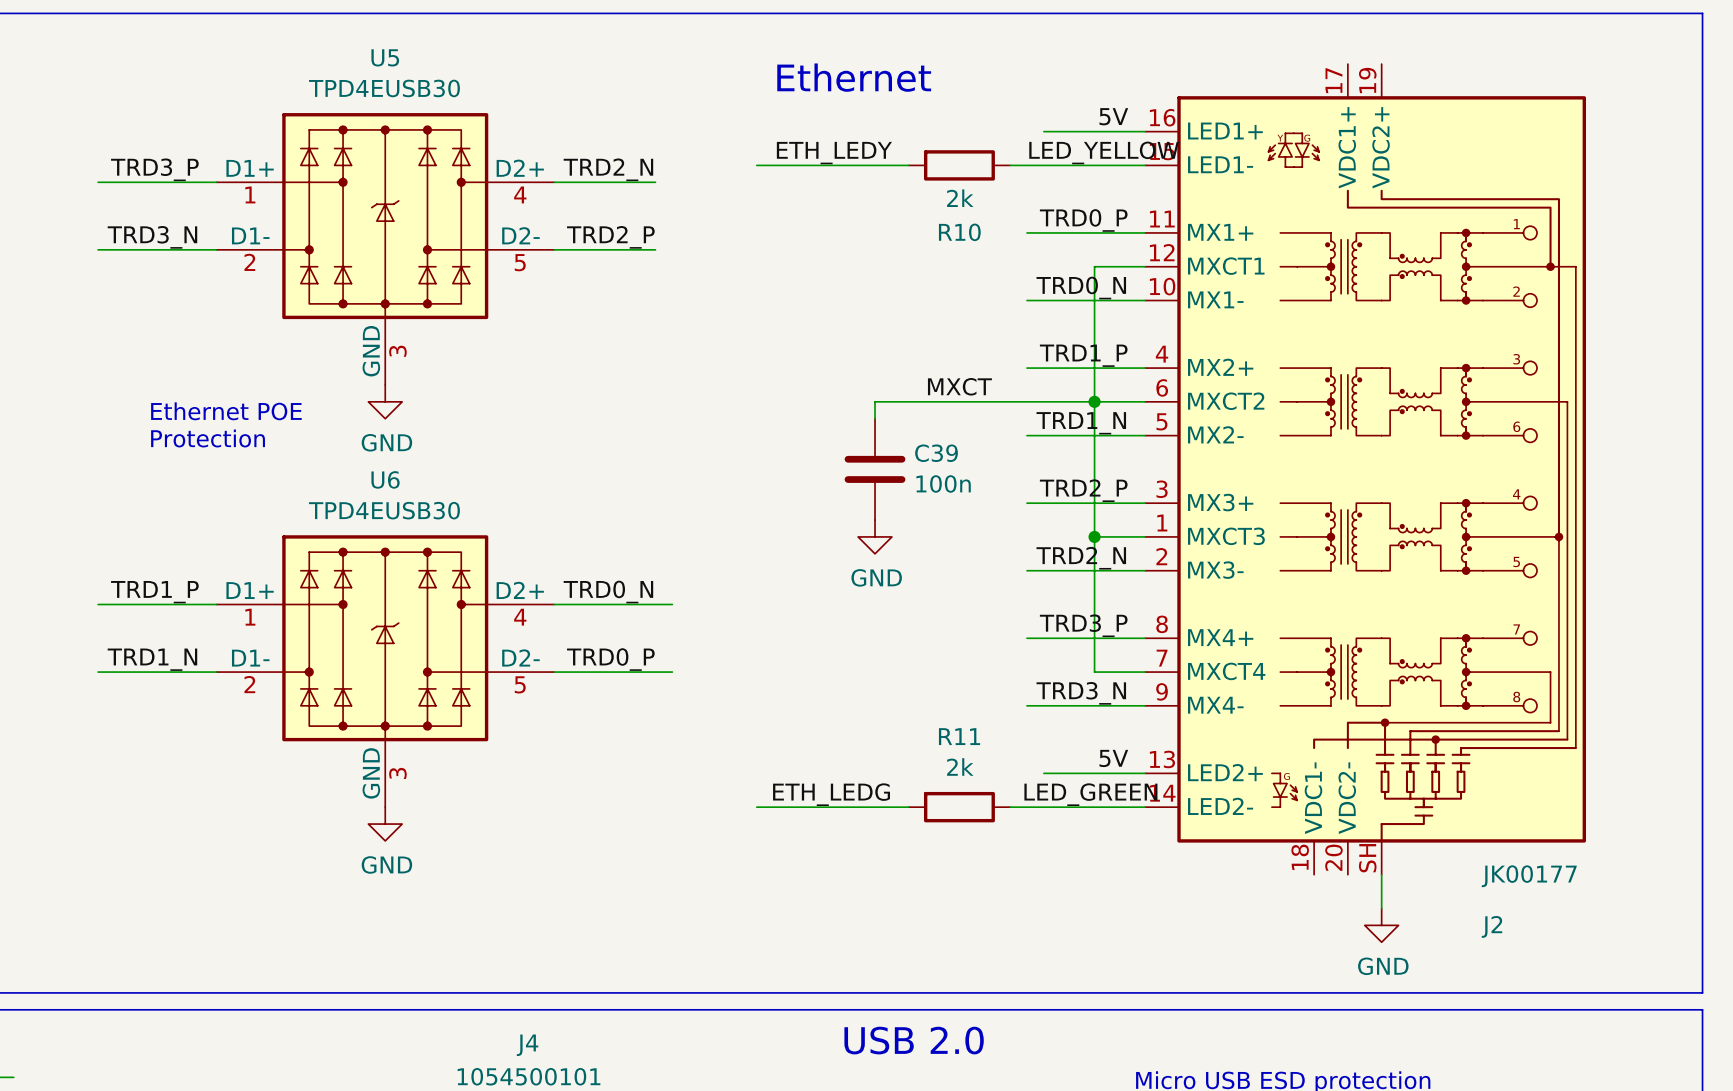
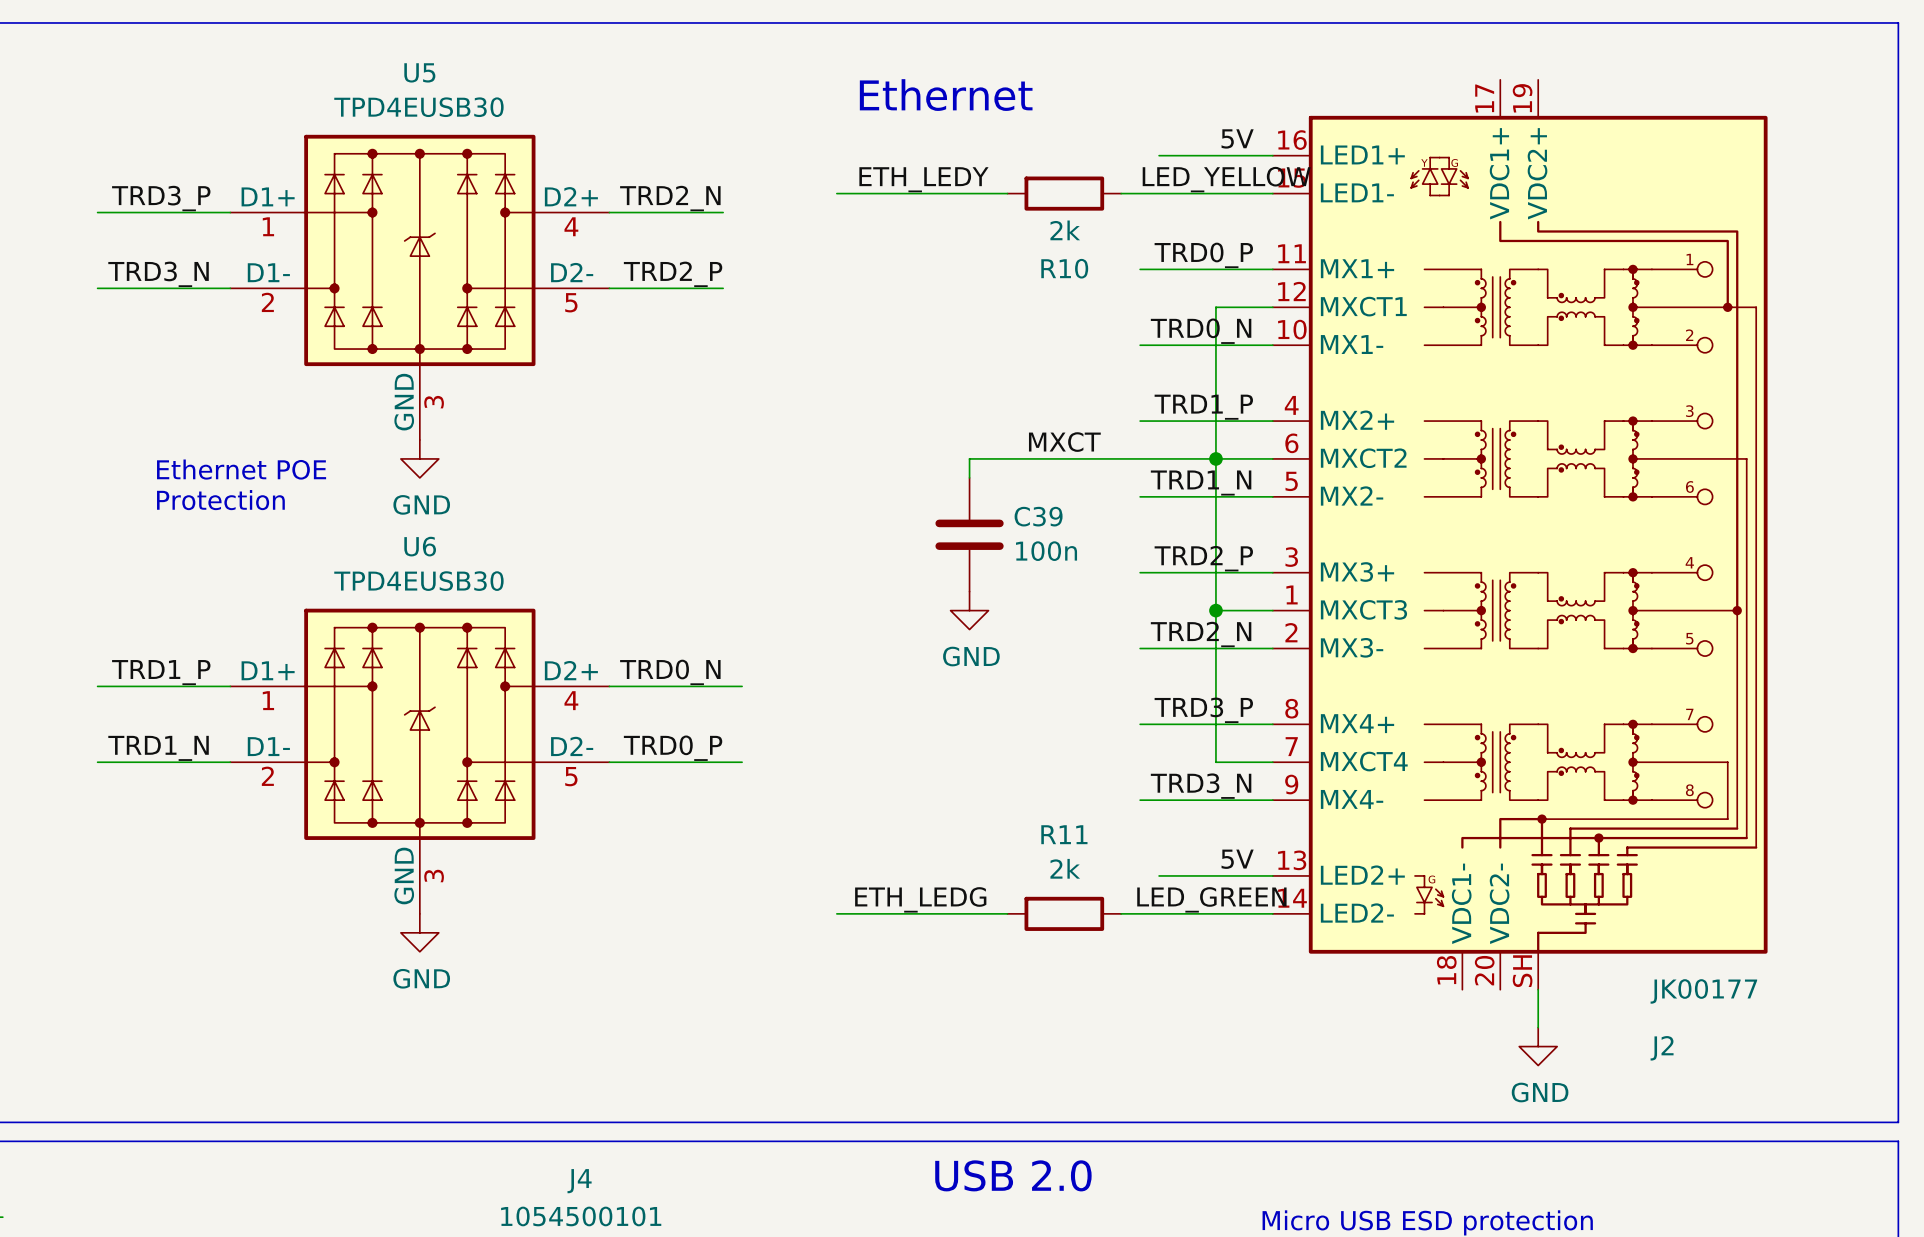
J2 symbol: [1145, 64, 1587, 875] -> [1272, 79, 1768, 990]

